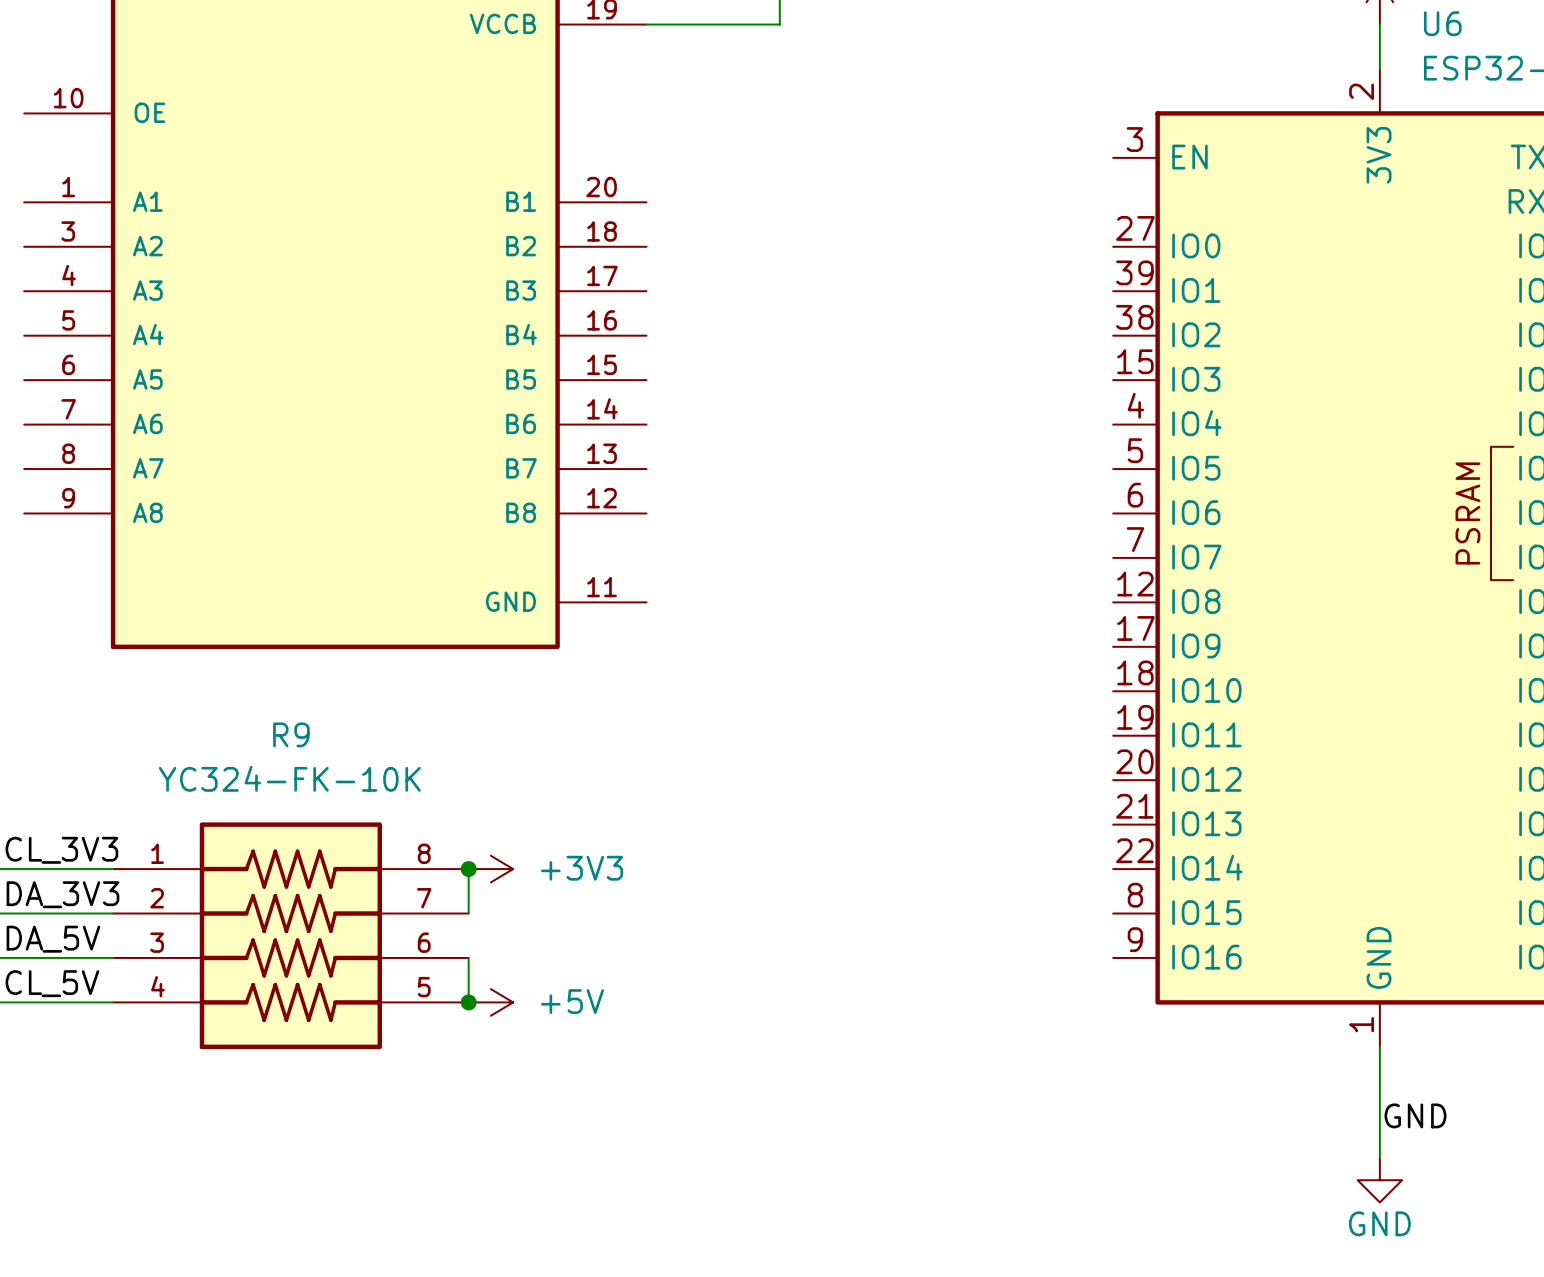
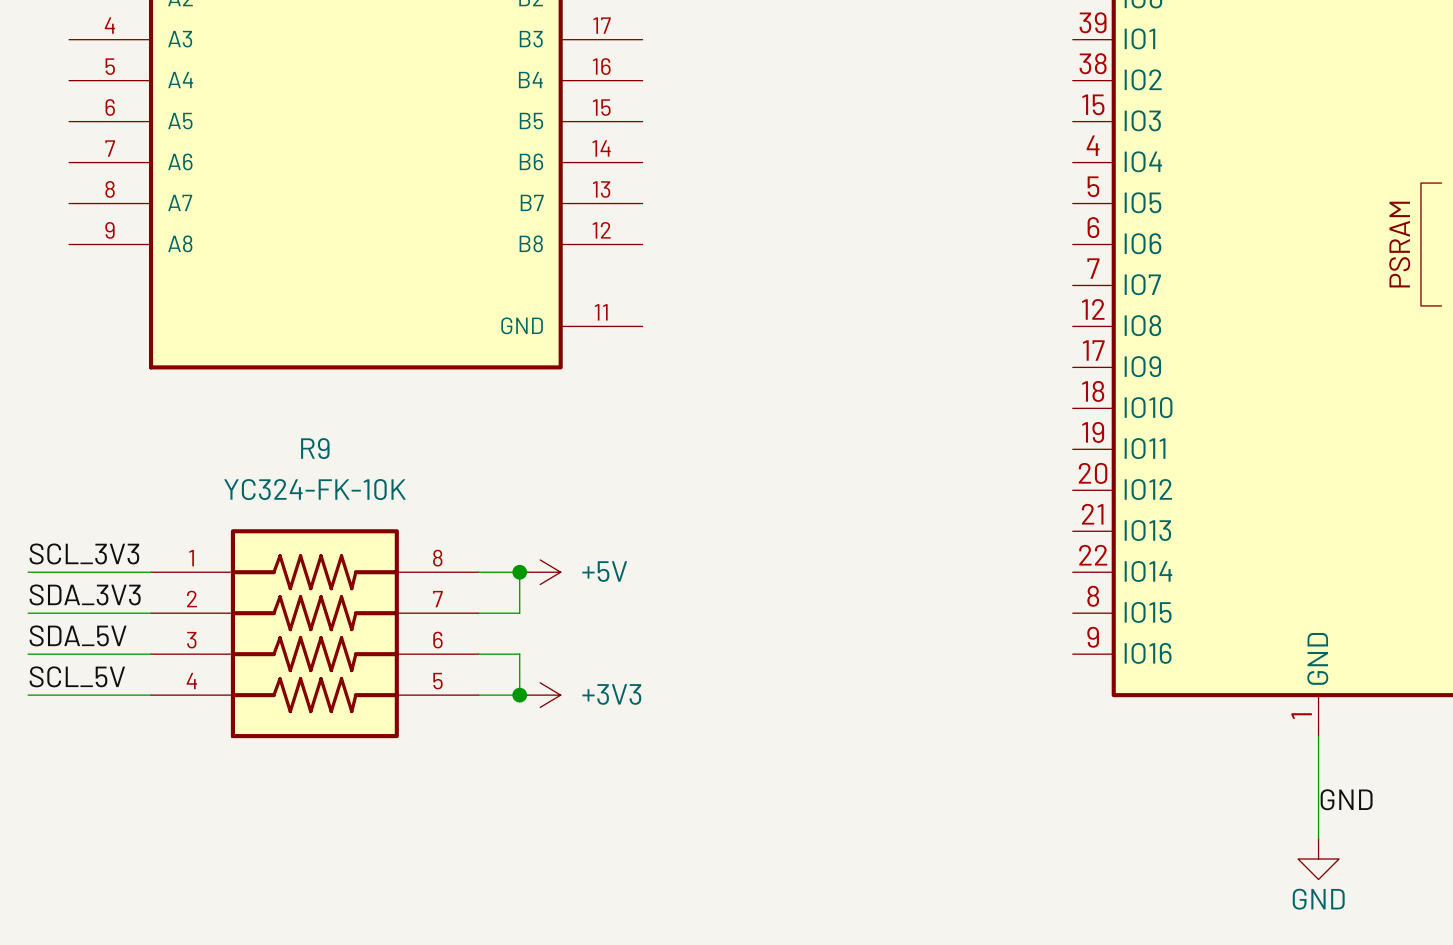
wire: (468, 869) (468, 913) -> (478, 572) (519, 572) (519, 613) (478, 613)
junction position: (468, 869) -> (519, 572)
power symbol position: +3V3 (490, 869) -> +3V3 (540, 695)
wire: (468, 957) (468, 1002) -> (478, 654) (519, 654) (519, 695) (478, 695)
junction position: (468, 1002) -> (519, 695)
power symbol position: +5V (490, 1002) -> +5V (540, 572)

